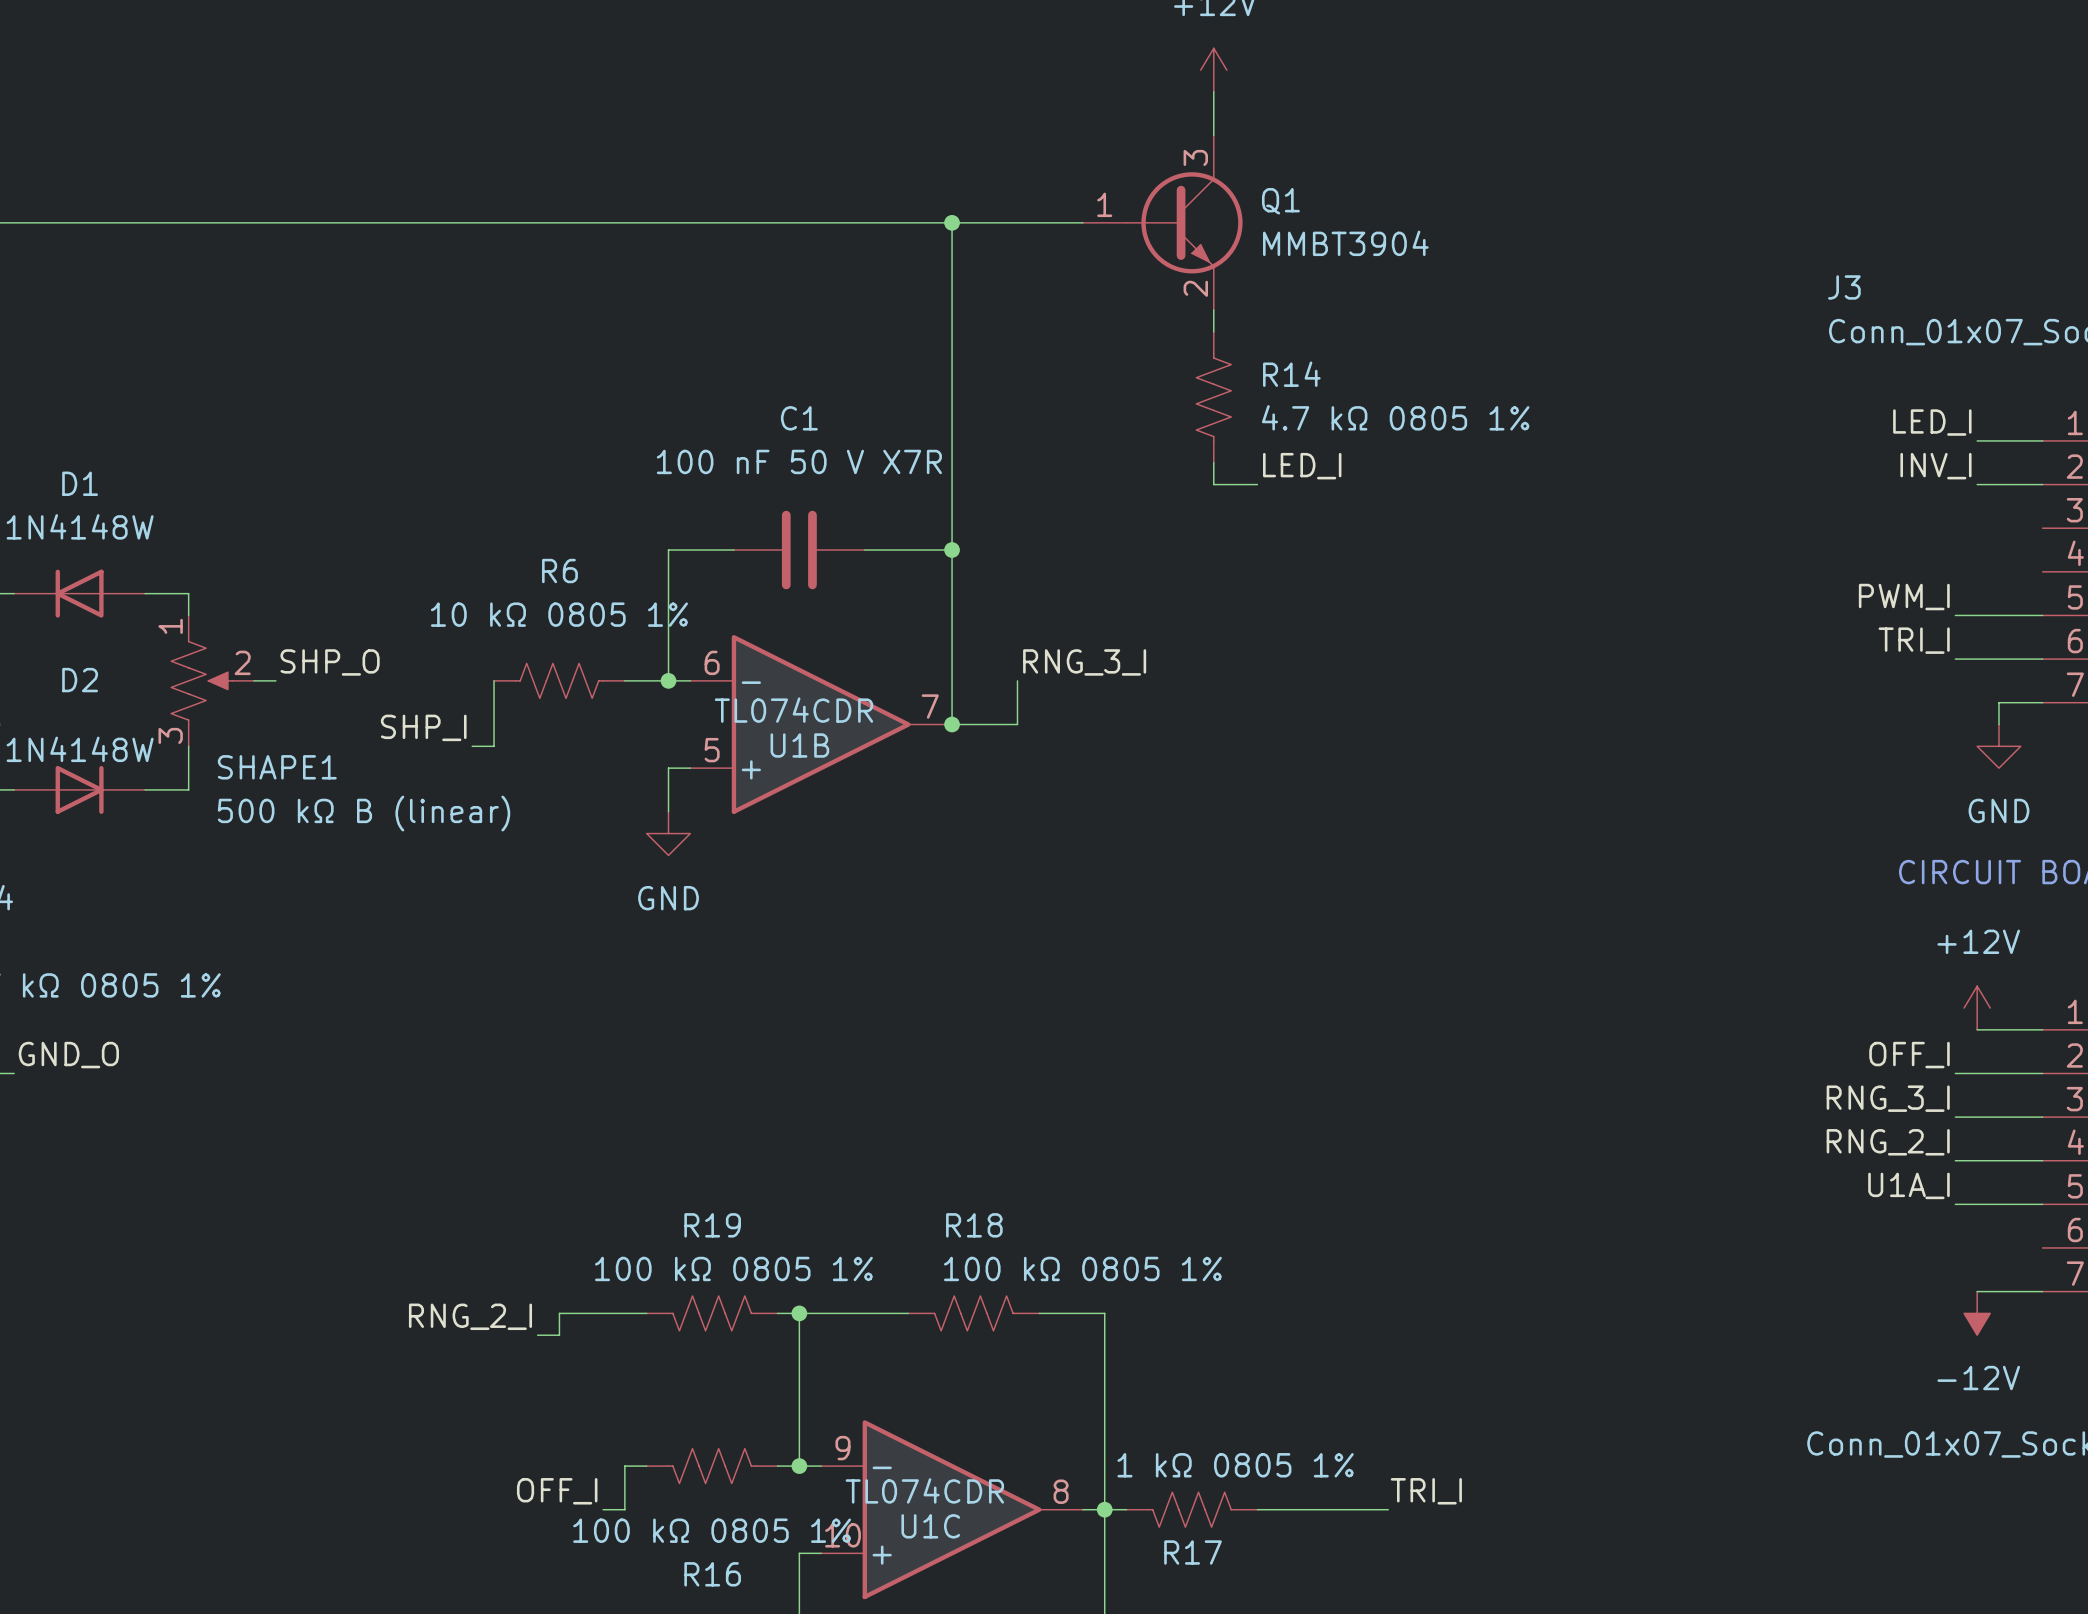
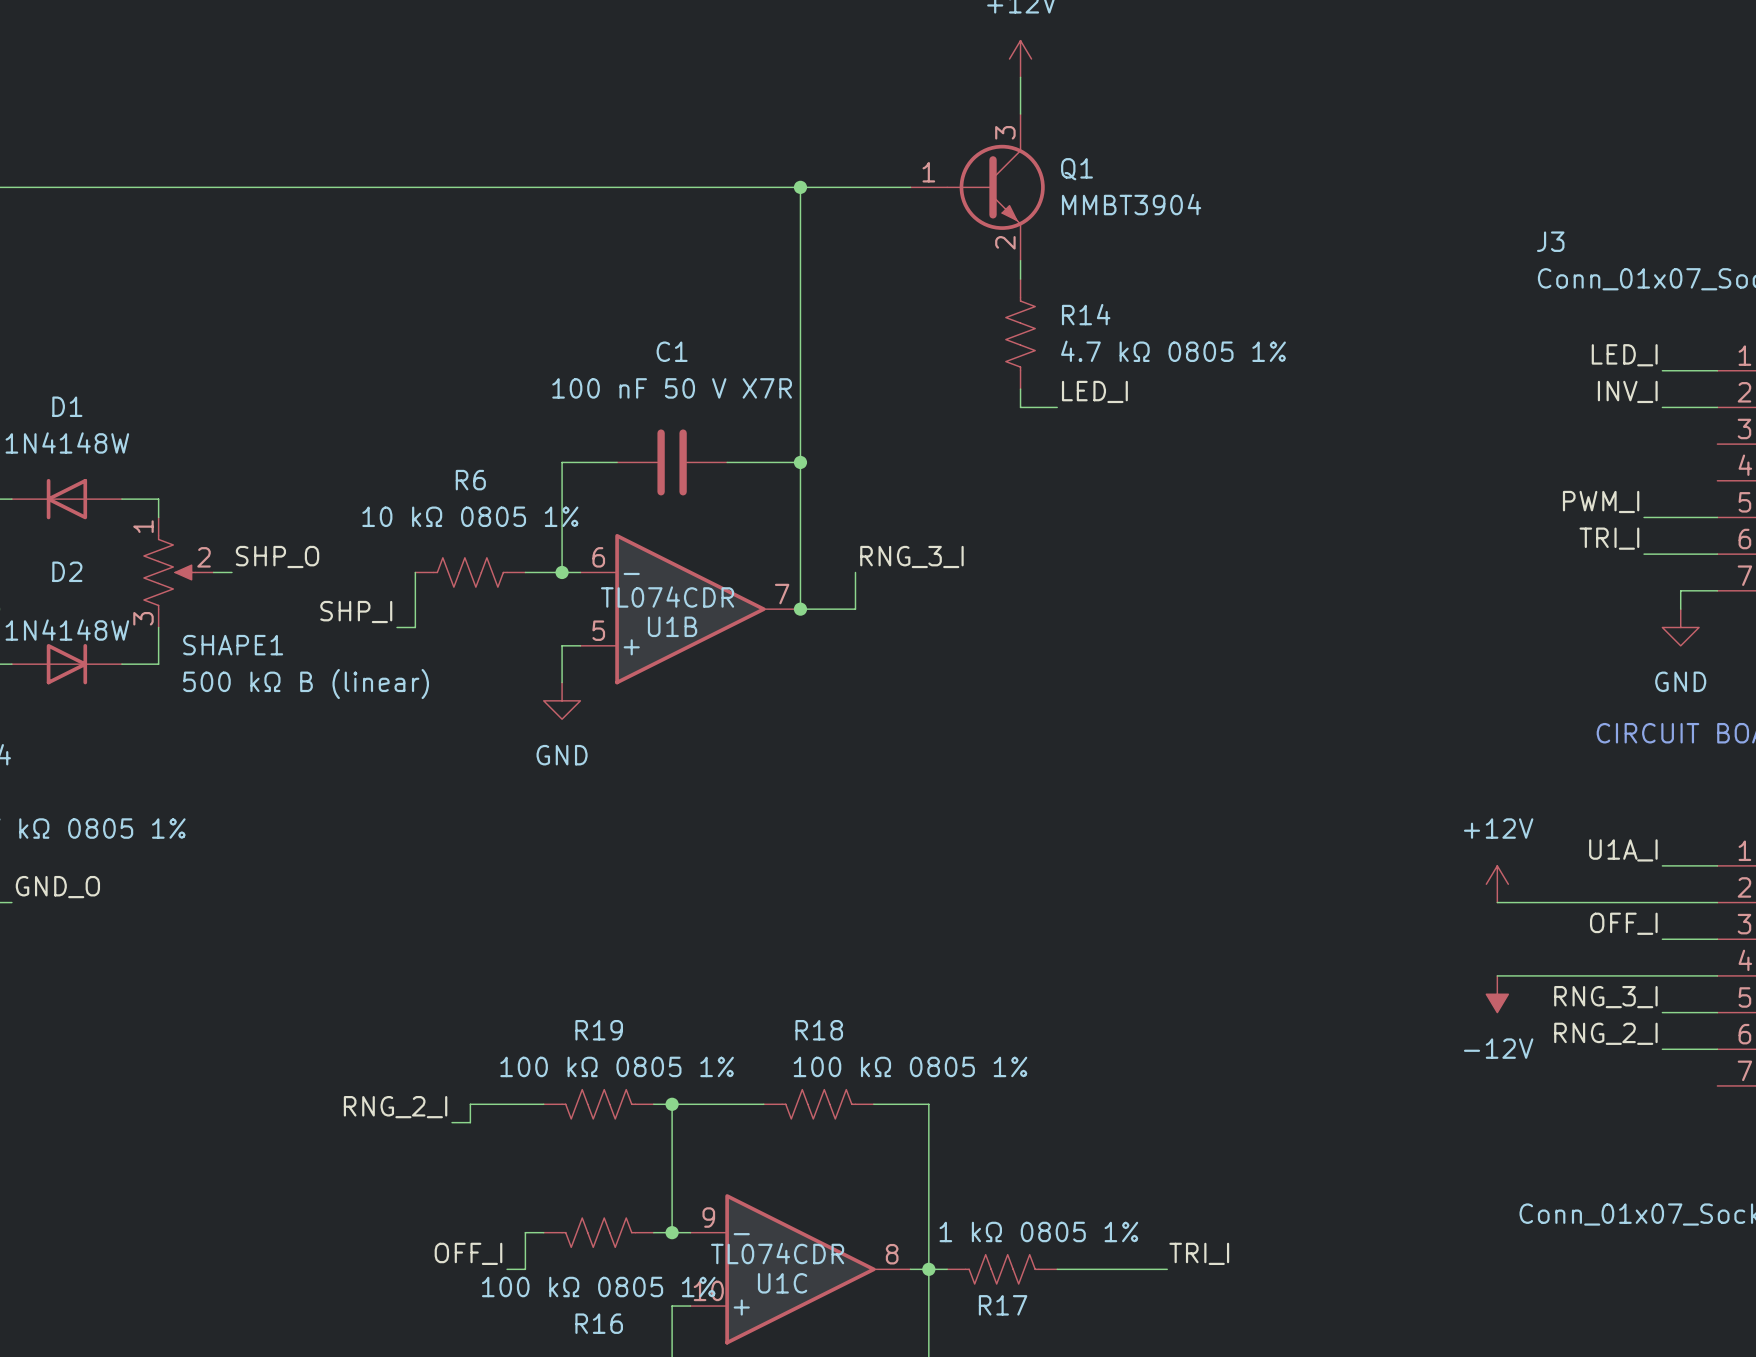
power symbol position: +12V (1977, 1008) -> +12V (1497, 884)
label position: OFF_I (1909, 1055) -> OFF_I (1623, 923)
wire: none -> (1497, 902) (1644, 902)
label position: RNG_3_I (1888, 1098) -> RNG_3_I (1605, 997)
wire: (1955, 1117) (1977, 1117) -> none
label position: RNG_2_I (1888, 1142) -> RNG_2_I (1605, 1033)
wire: none -> (1497, 975) (1644, 975)
label position: U1A_I (1908, 1185) -> U1A_I (1623, 850)
wire: (1955, 1204) (1977, 1204) -> none
wire: (1977, 1291) (2042, 1291) -> (1662, 1049) (1717, 1049)
power symbol position: -12V (1977, 1313) -> -12V (1497, 994)

